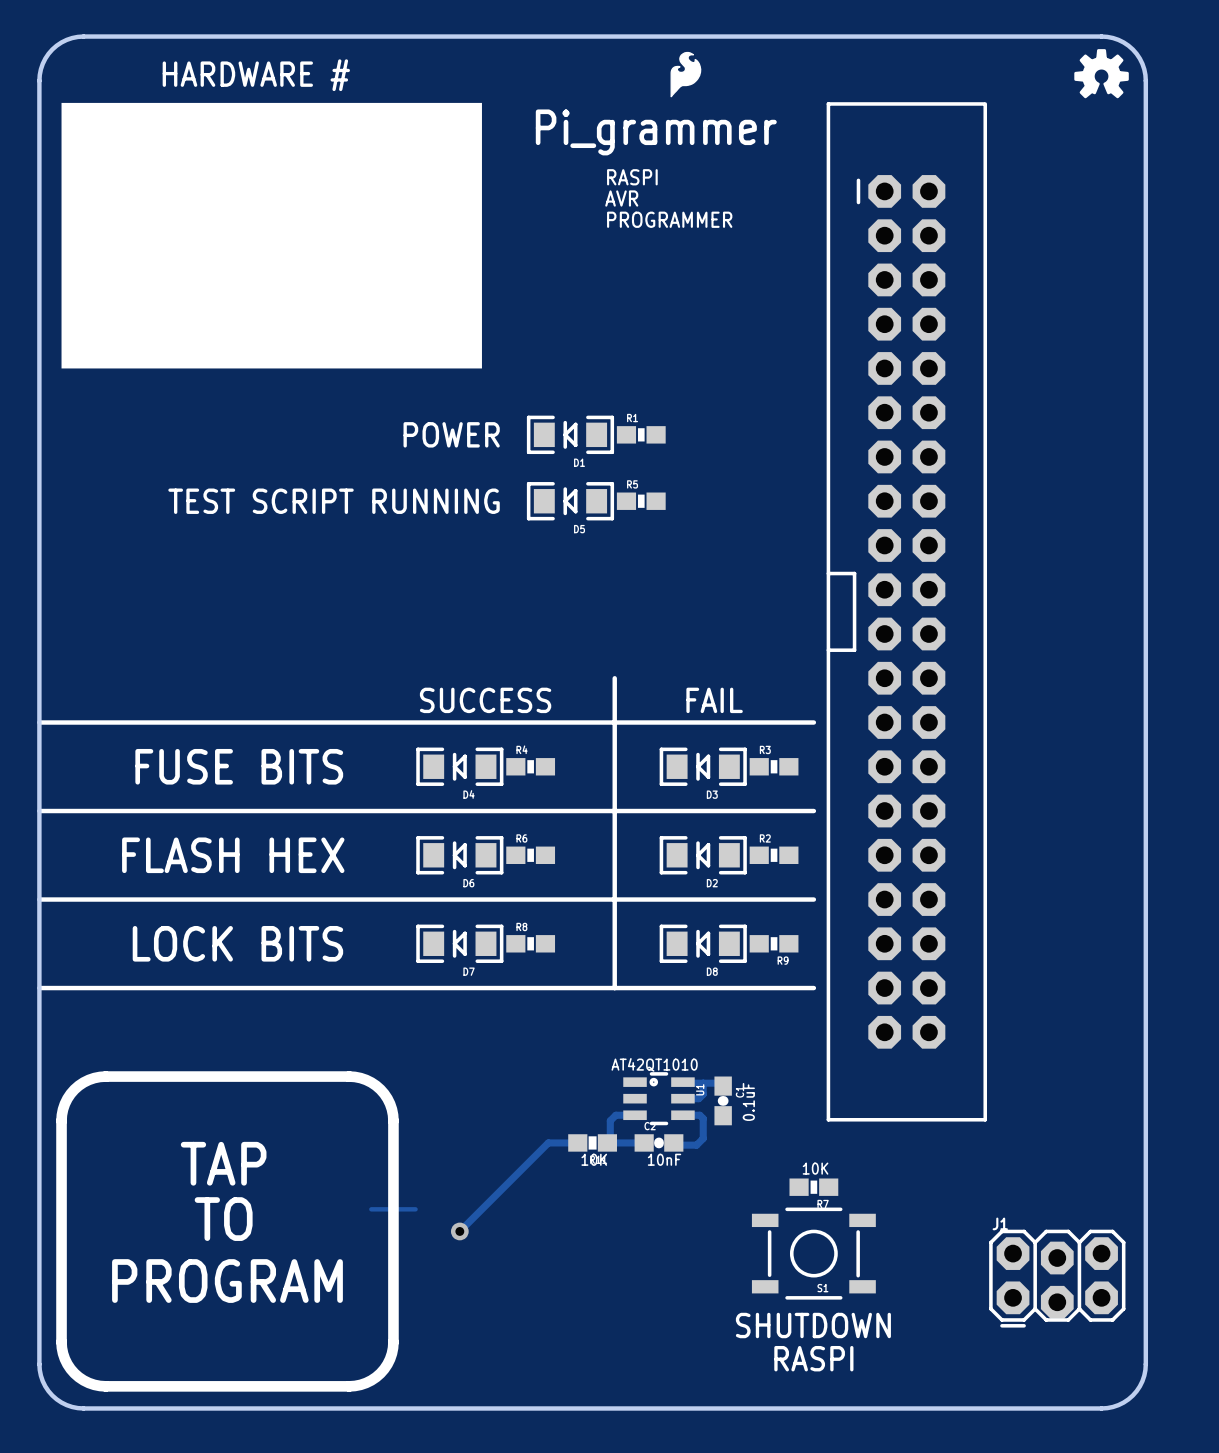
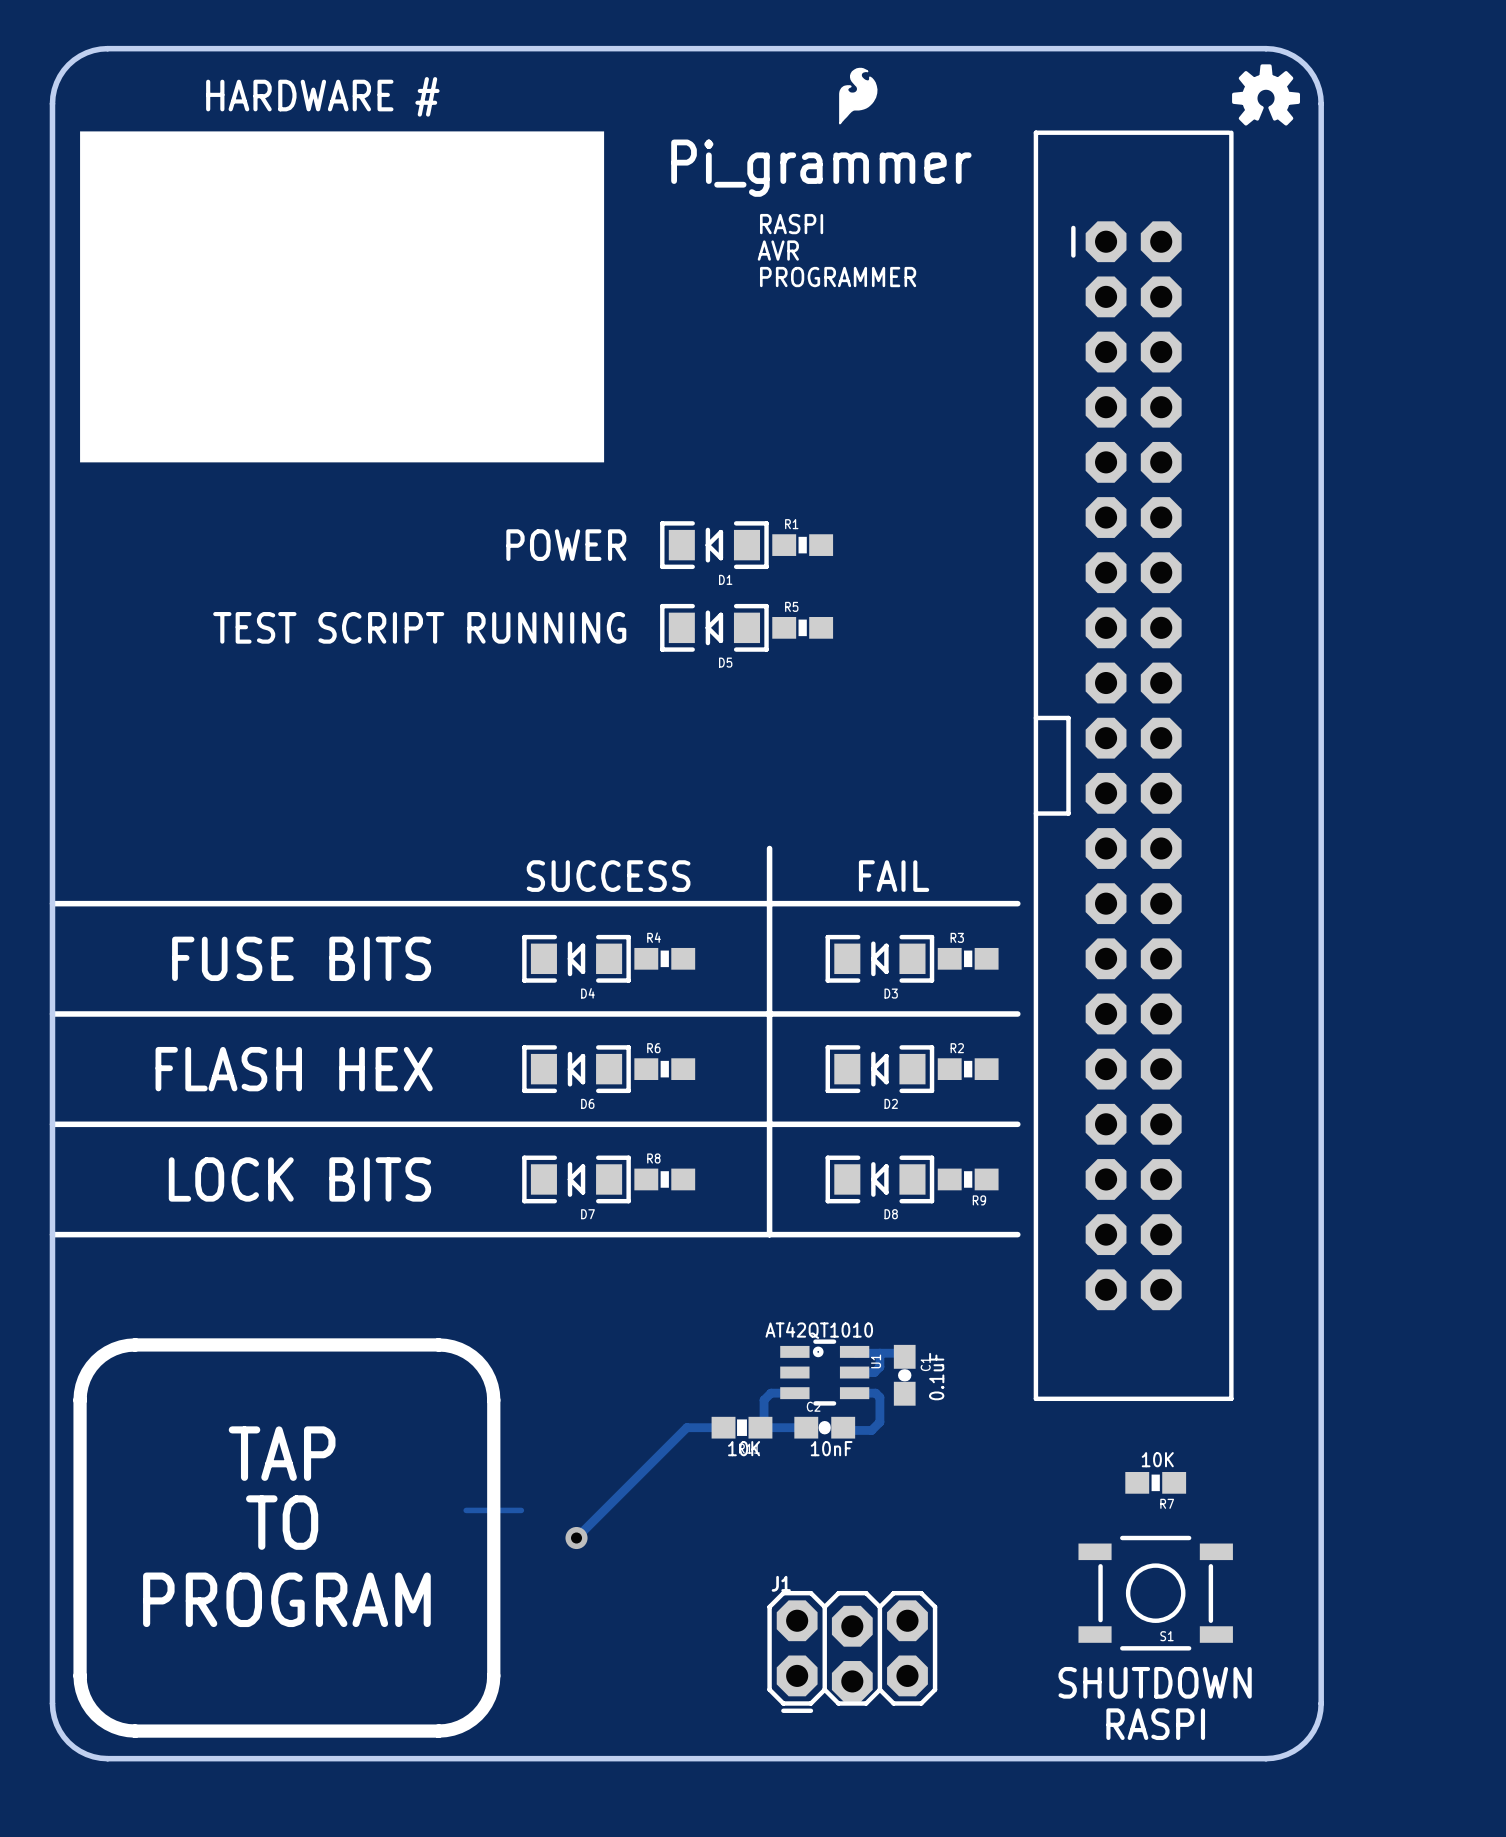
board edge: (1013, 36) (1113, 38) (1128, 45) (1136, 53) (1144, 69) (1145, 80) (1145, 1370) (1142, 1381) (1132, 1395) (1123, 1402) (1113, 1406) (1013, 1408) -> (1266, 48) (1287, 52) (1305, 64) (1316, 82) (1321, 103) (1321, 1703) (1316, 1724) (1305, 1742) (1287, 1754) (1266, 1758)
drawing position: (1101, 73) -> (1266, 94)
text position: 10K (815, 1168) -> 10K (1157, 1459)
R7 position: (813, 1187) -> (1155, 1482)
S1 position: (813, 1253) -> (1155, 1593)
J1 position: (1057, 1278) -> (852, 1651)
text position: SHUTDOWN (813, 1325) -> SHUTDOWN (1155, 1682)
text position: RASPI (813, 1358) -> RASPI (1155, 1724)

